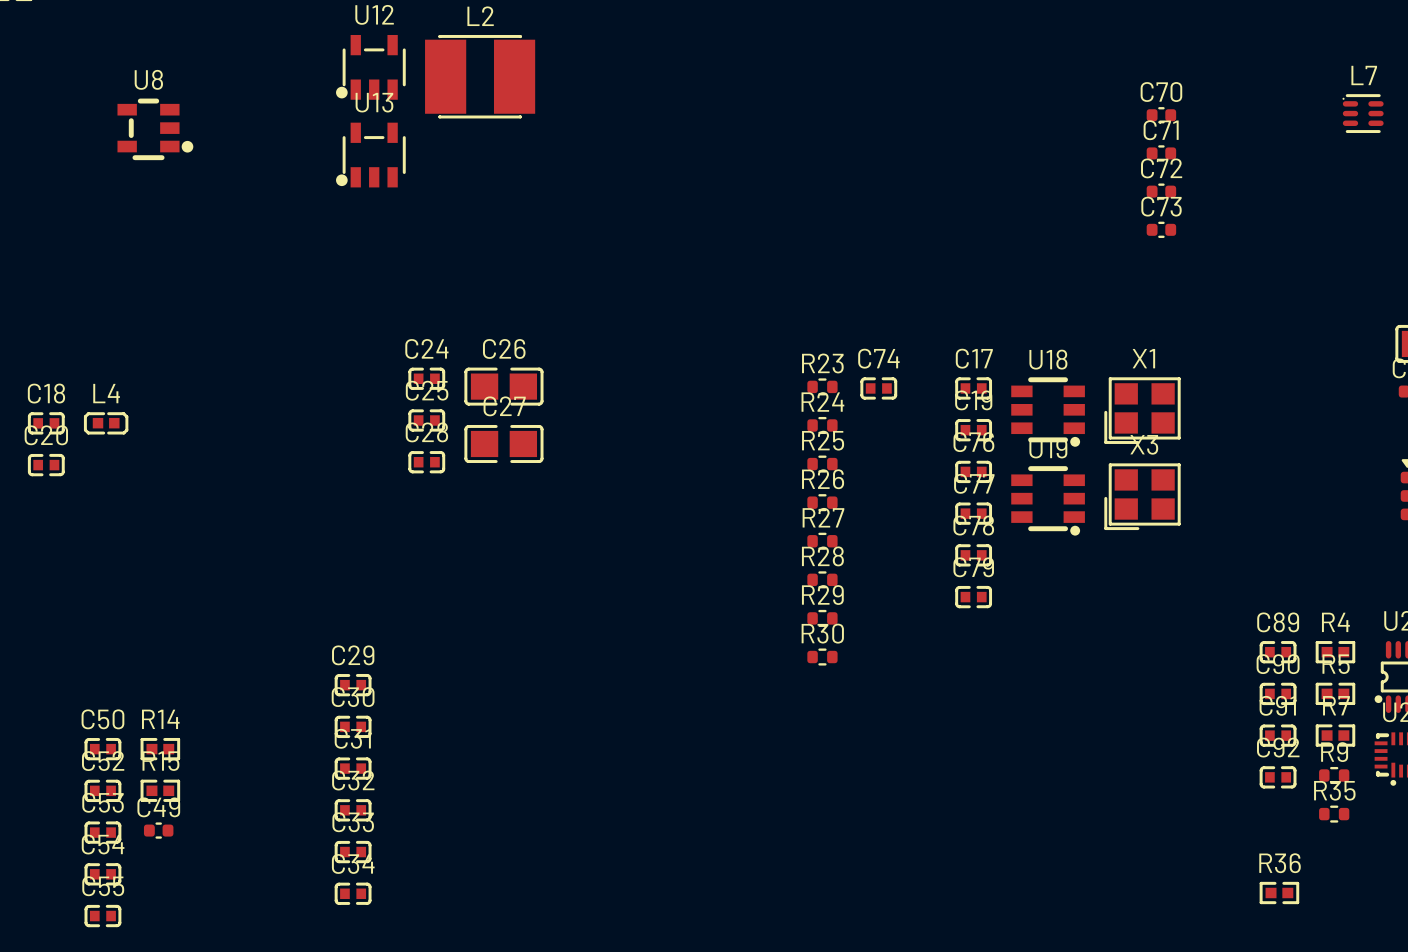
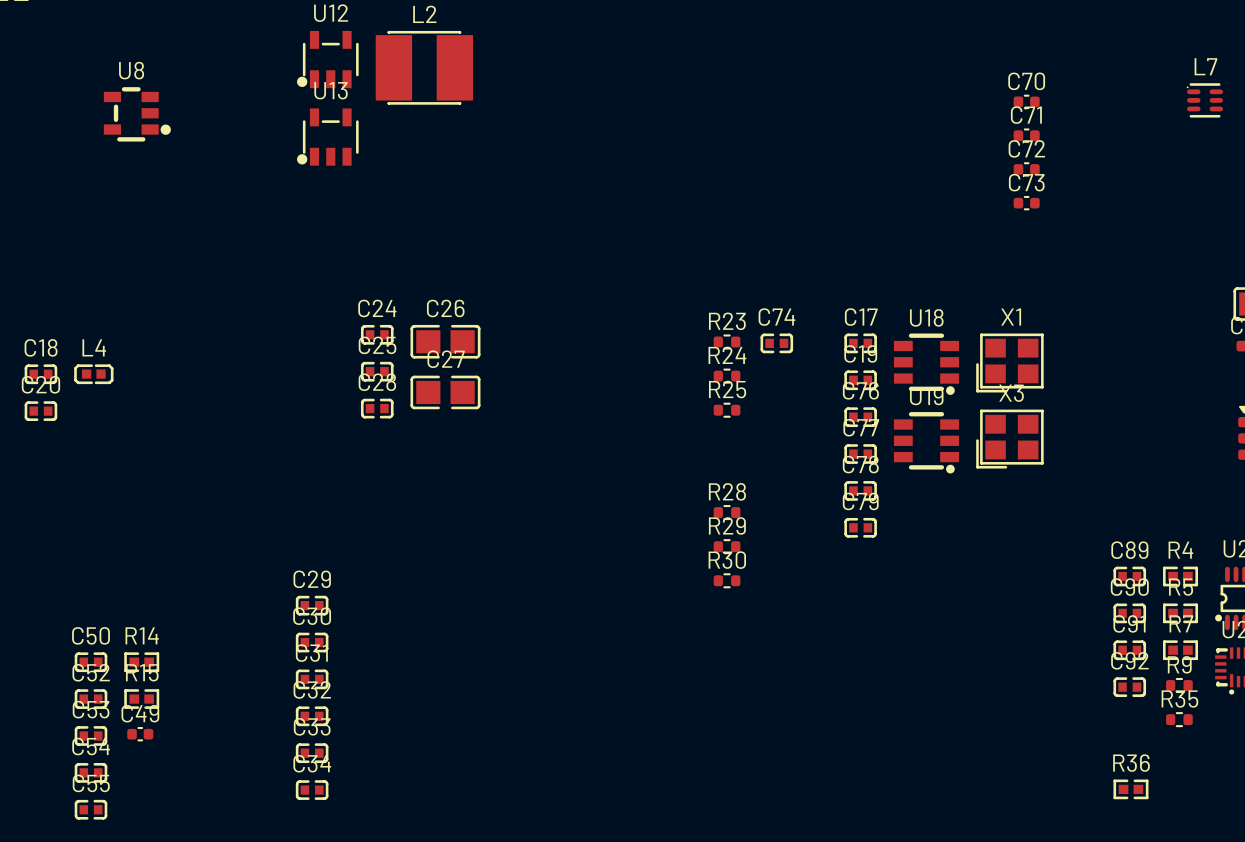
R26: (822, 502) -> none
R27: (822, 541) -> none

